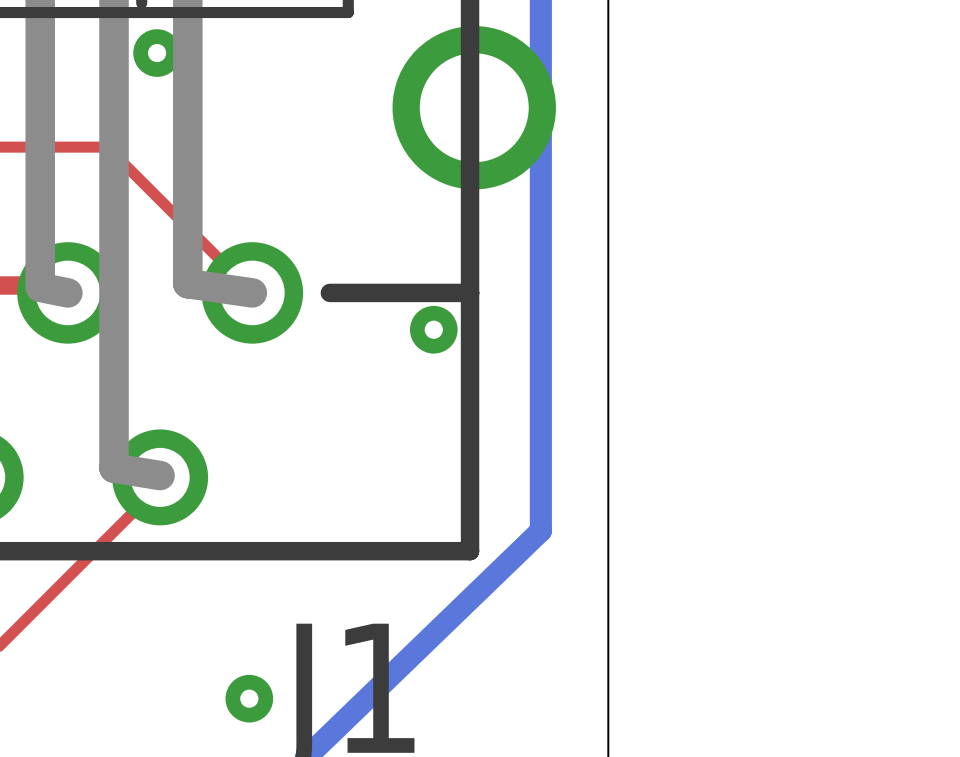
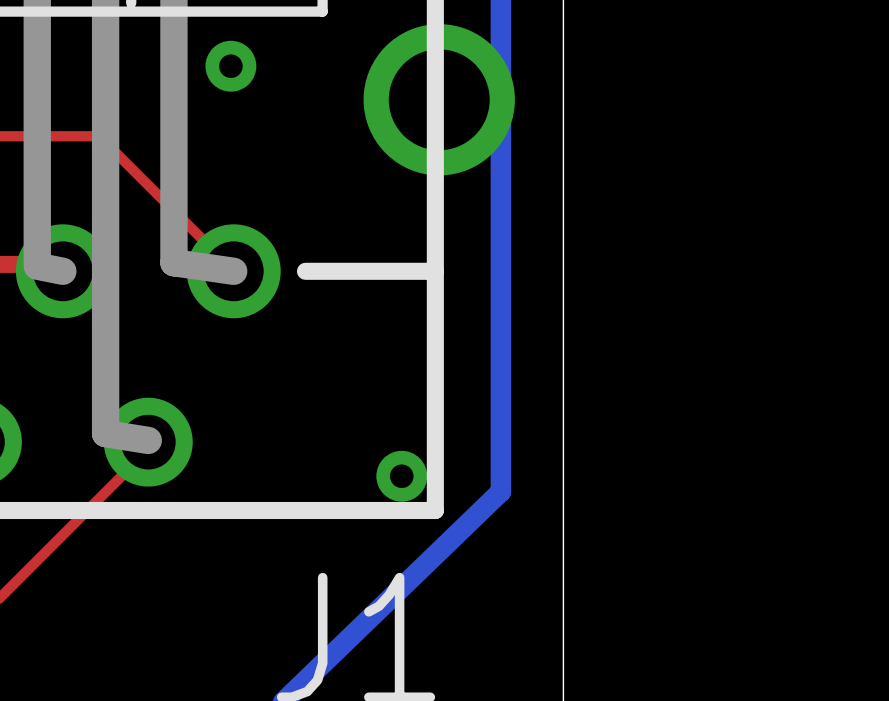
via: (157, 53) -> none
via: none -> (230, 66)
via: (433, 329) -> none
via: none -> (401, 476)
via: (249, 698) -> none

